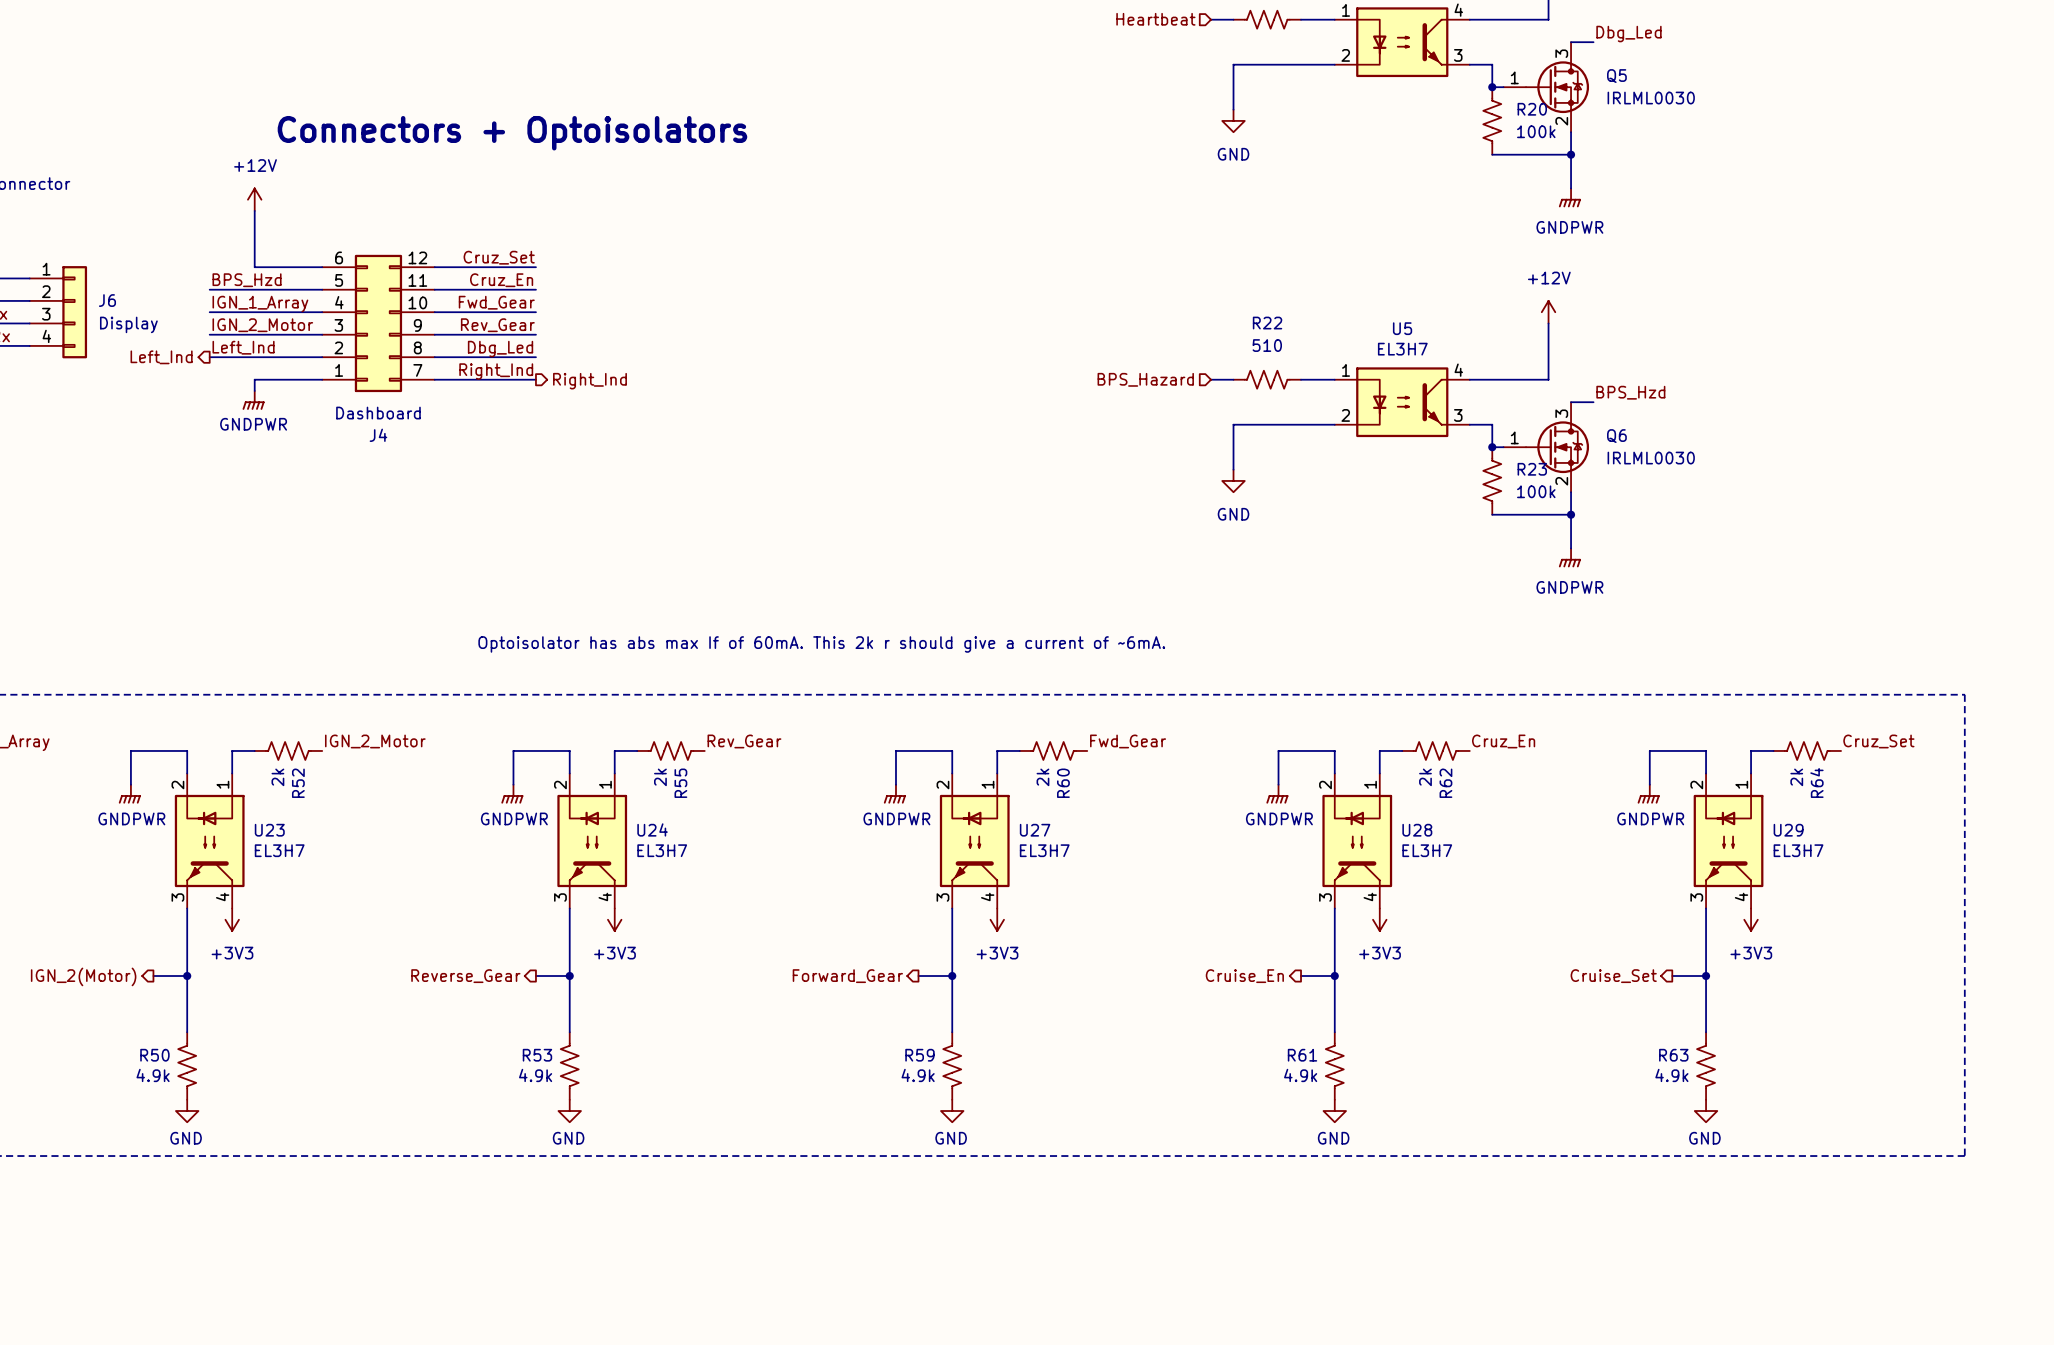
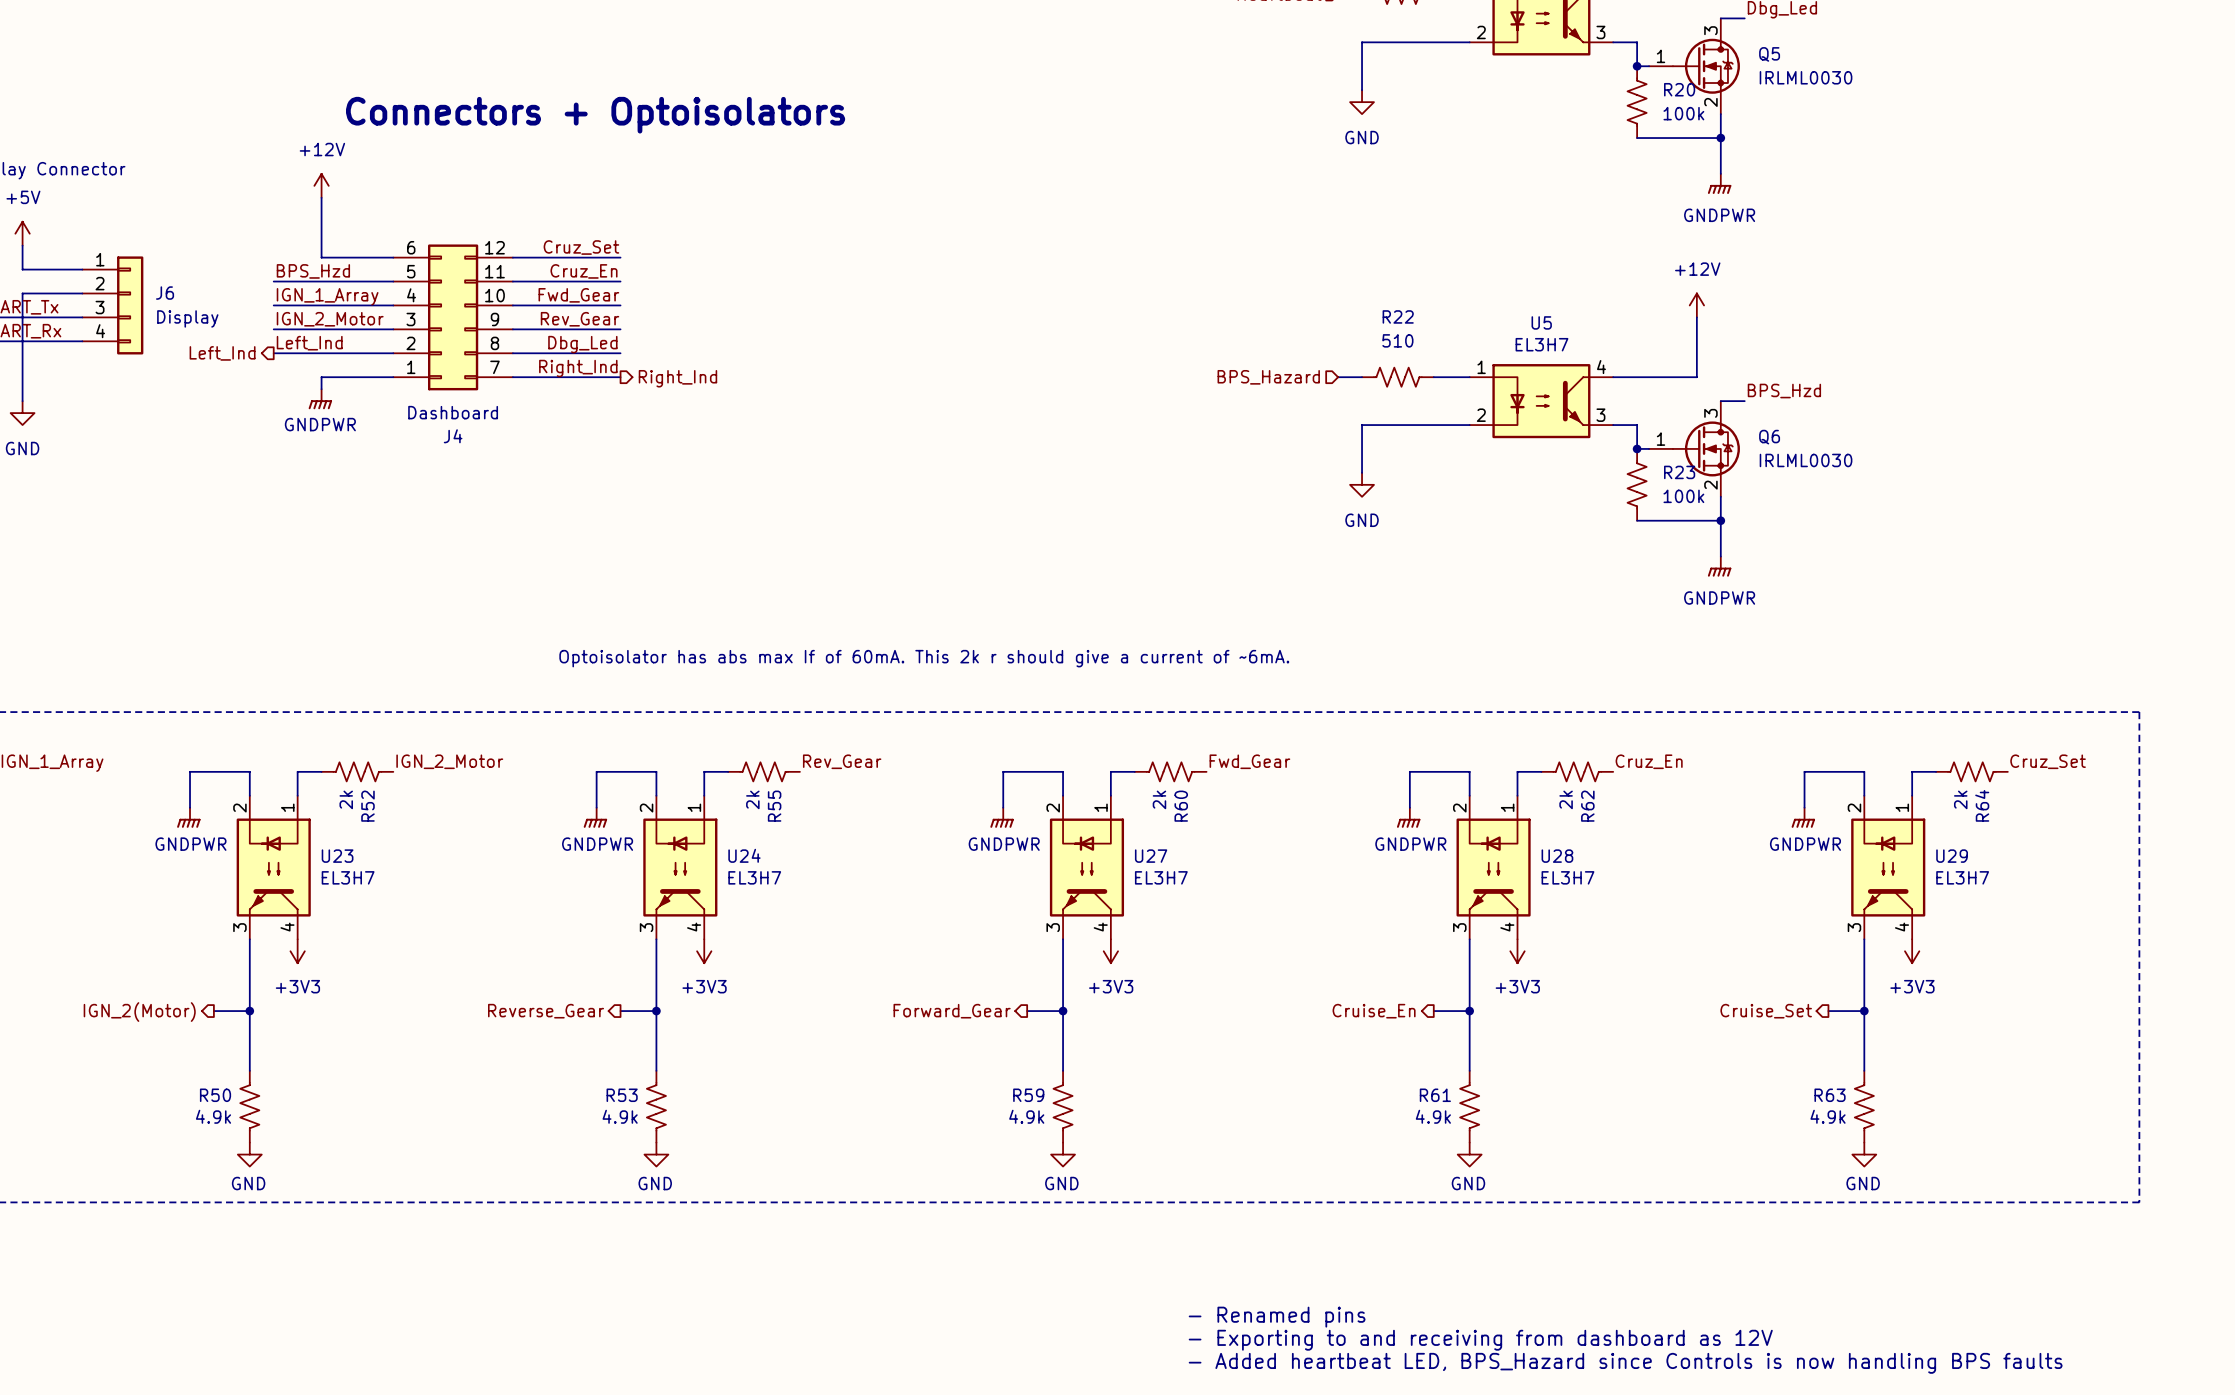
text: none -> - Renamed pins (1277, 1317)
text: none -> - Exporting to and receiving from dashboard as 12V (1480, 1340)
text: none -> - Added heartbeat LED, BPS_Hazard since Controls is now handling BPS faults (1625, 1363)

